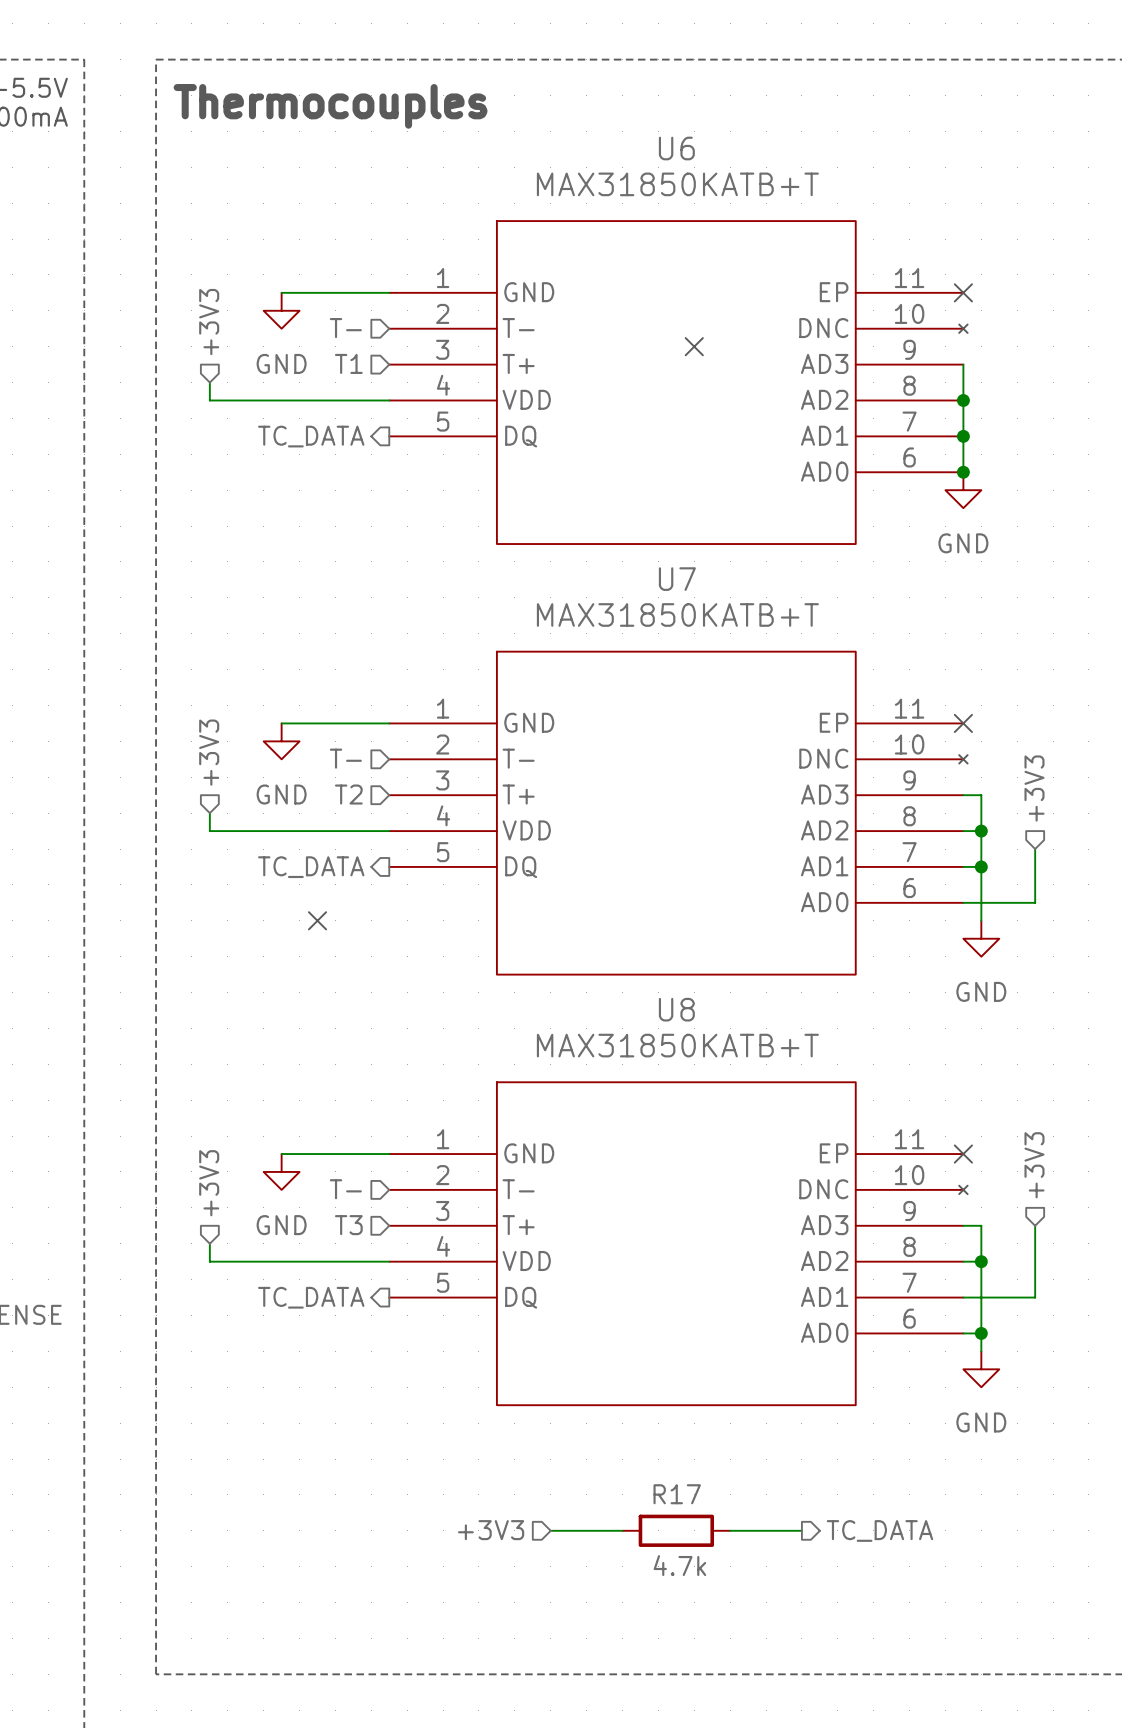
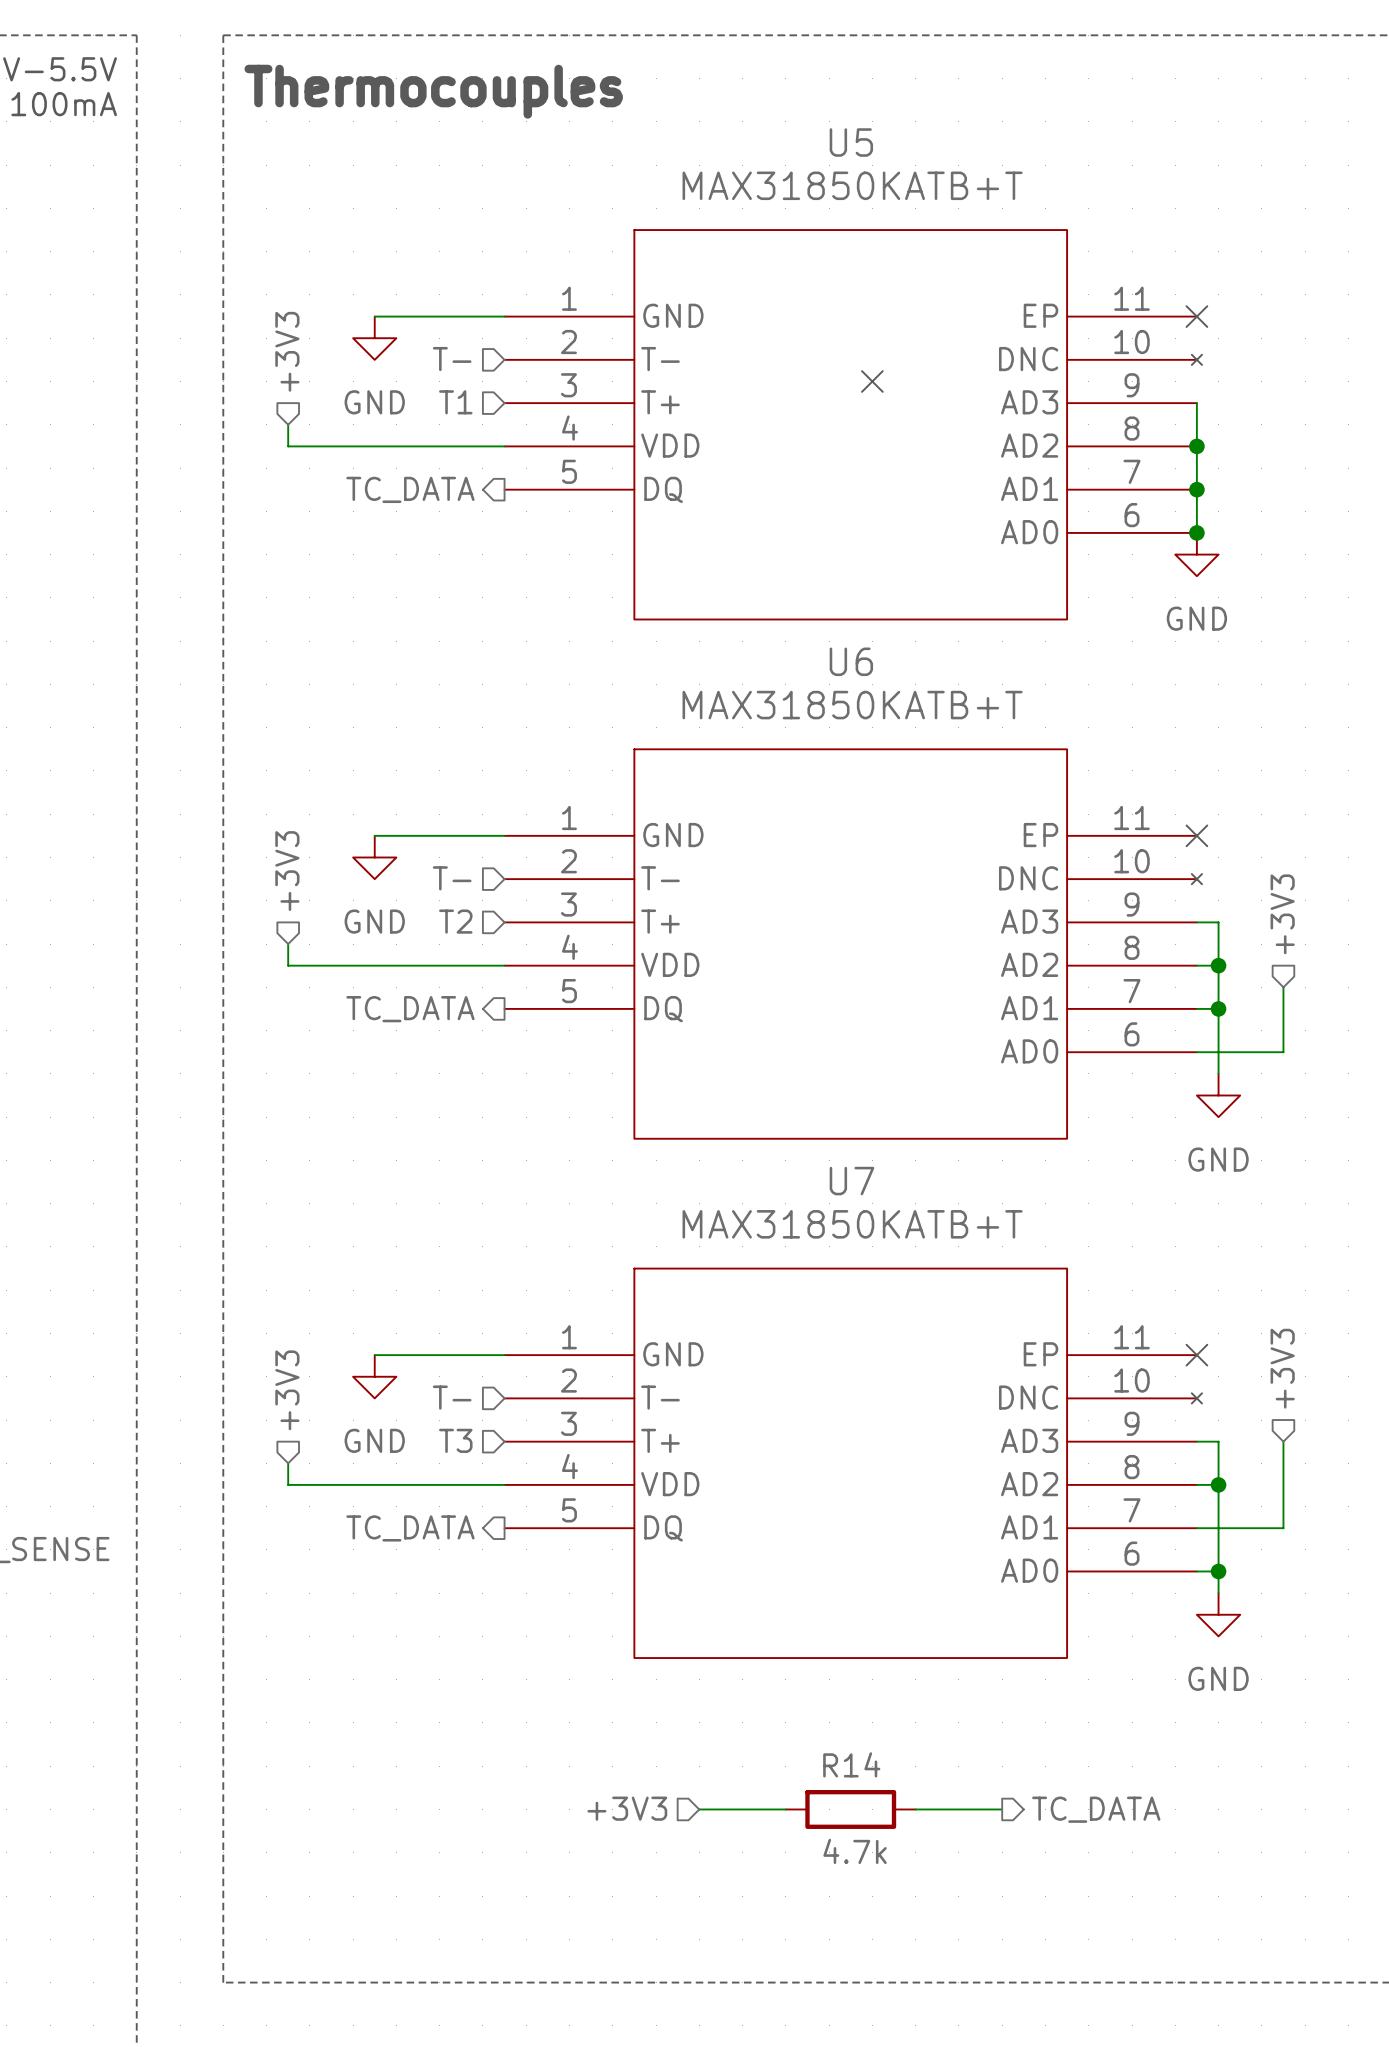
U6 name: U6 (676, 148) -> U5 (851, 142)
U7 name: U7 (677, 579) -> U6 (851, 661)
no-connect mark: (317, 920) -> none
U8 name: U8 (676, 1009) -> U7 (851, 1181)
R17 name: R17 (677, 1494) -> R14 (851, 1764)

